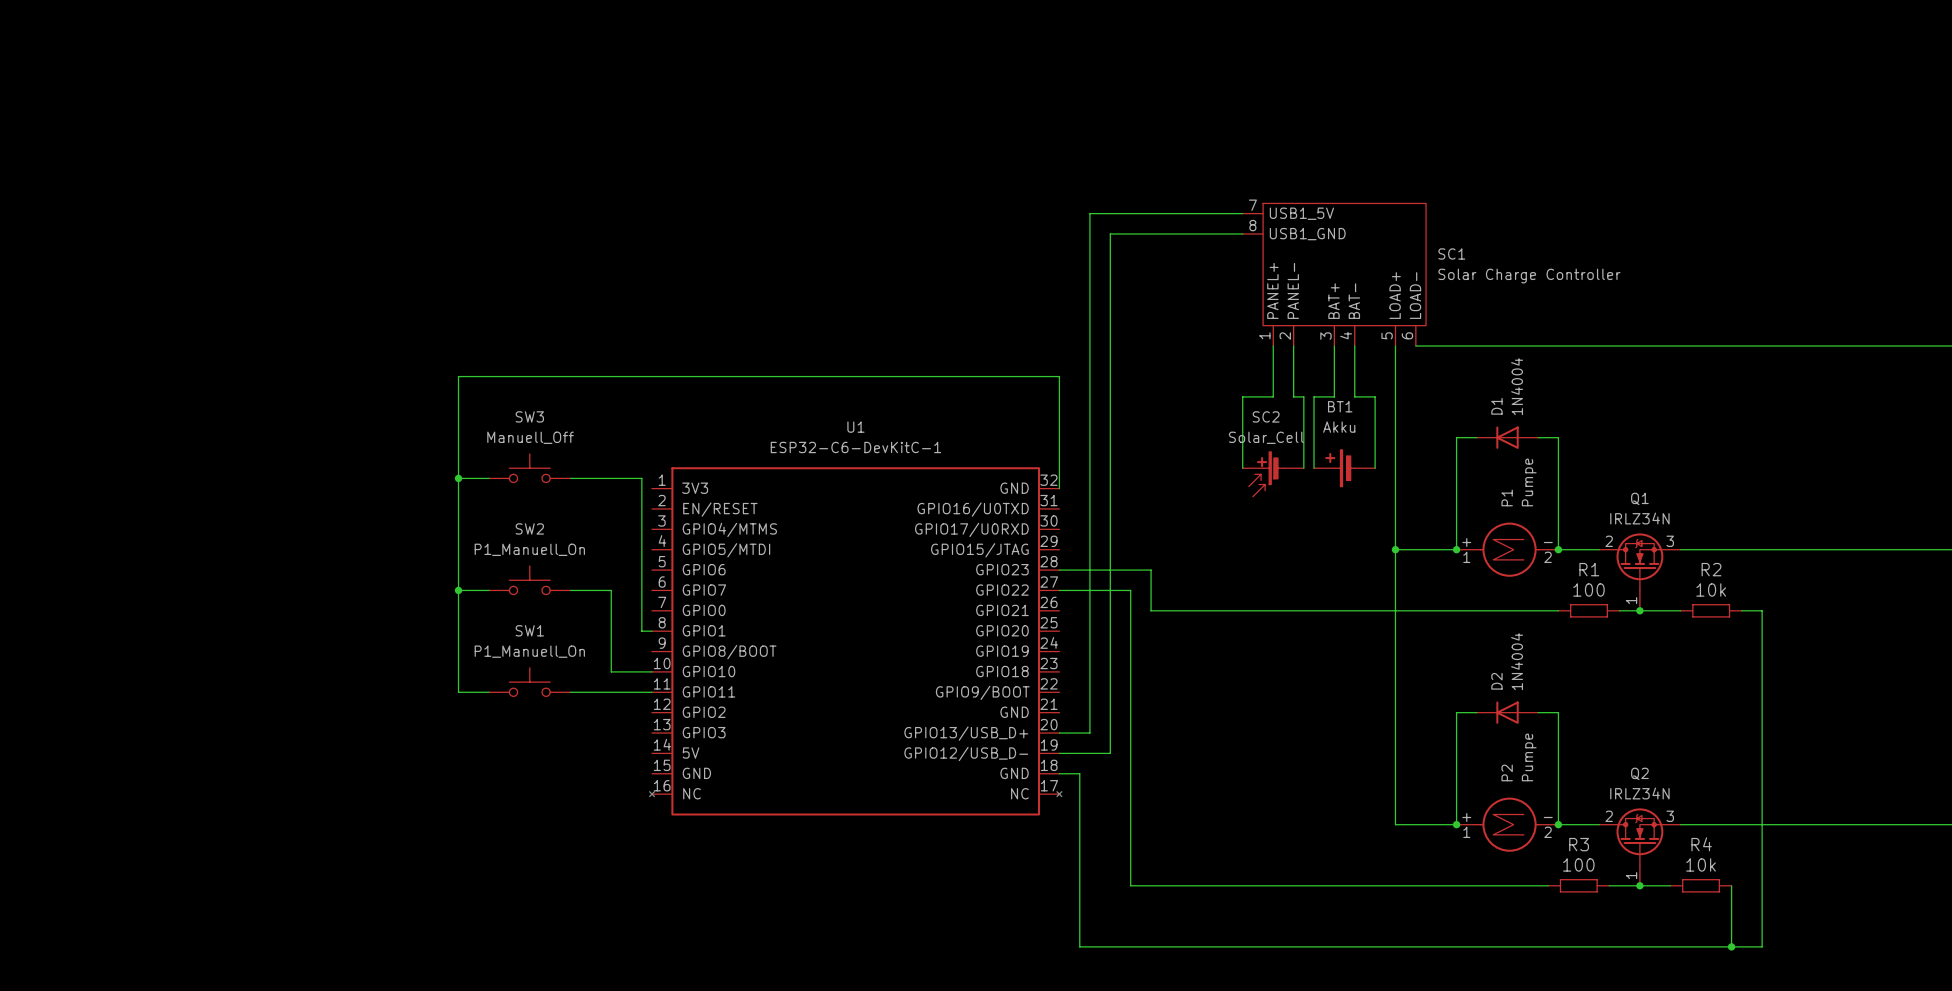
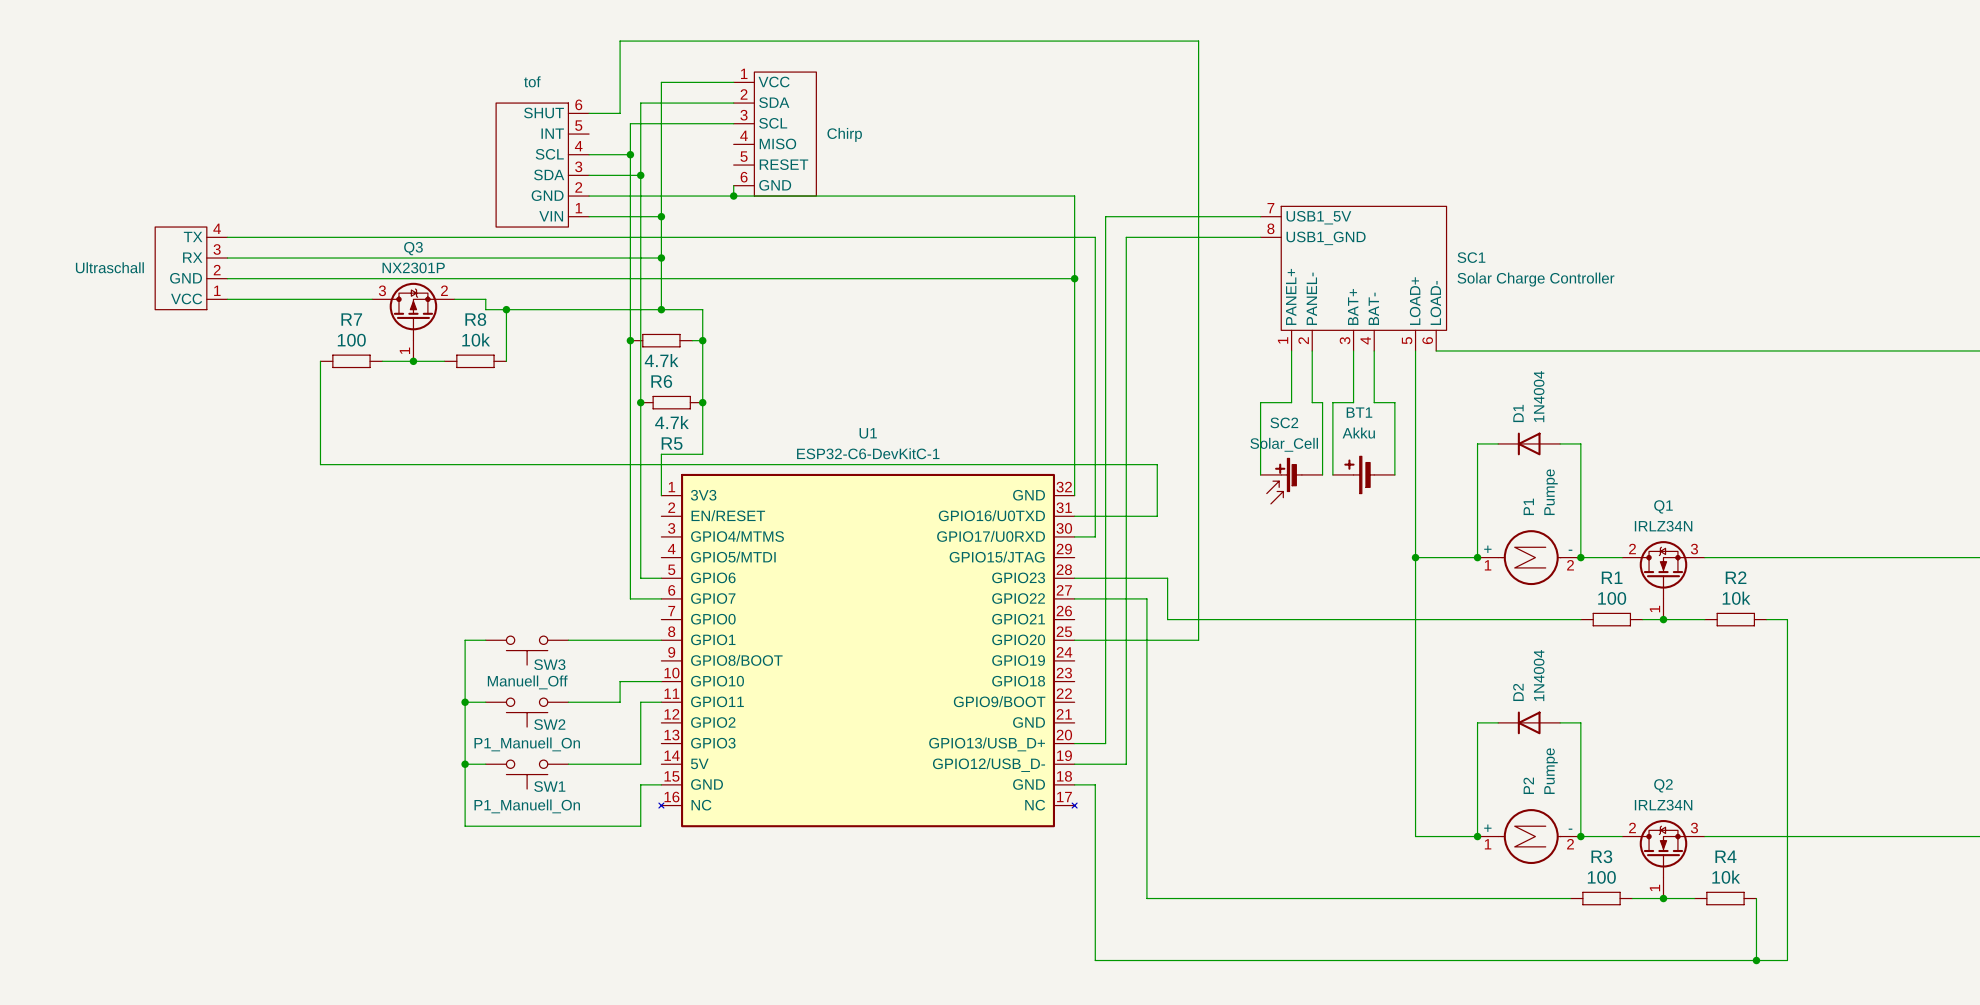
wire: none -> (733, 82) (661, 82) (661, 309)
wire: none -> (733, 103) (640, 103) (640, 578) (661, 578)
wire: none -> (589, 113) (620, 113) (620, 41) (1198, 41) (1198, 640) (1074, 640)
wire: none -> (733, 123) (630, 123) (630, 598) (661, 598)
Chirp: none -> (775, 134)
wire: none -> (589, 154) (630, 154)
junction: none -> (630, 154)
tof: none -> (542, 165)
wire: none -> (589, 175) (640, 175)
junction: none -> (640, 175)
wire: none -> (733, 185) (733, 196)
junction: none -> (733, 196)
wire: none -> (589, 216) (661, 216)
junction: none -> (661, 216)
wire: none -> (227, 237) (1095, 237) (1095, 536) (1074, 536)
wire: none -> (227, 258) (661, 258)
junction: none -> (661, 258)
Ultraschall: none -> (191, 268)
wire: none -> (227, 278) (1074, 278)
junction: none -> (1074, 278)
wire: none -> (227, 299) (372, 299)
wire: none -> (454, 299) (485, 299) (485, 309) (702, 309) (702, 454) (661, 454) (661, 495)
wire: none -> (506, 309) (506, 361)
junction: none -> (506, 309)
junction: none -> (661, 309)
Q3: none -> NX2301P (413, 322)
junction: none -> (630, 340)
R6: none -> 4.7k (661, 340)
wire: none -> (692, 340) (702, 340)
junction: none -> (702, 340)
wire: none -> (320, 361) (320, 464) (1157, 464) (1157, 516) (1074, 516)
R7: none -> 100 (351, 361)
wire: none -> (382, 361) (444, 361)
junction: none -> (413, 361)
R8: none -> 10k (475, 361)
wire: (1059, 376) (458, 376) (458, 631) -> (1074, 381) (1074, 196) (589, 196)
junction: none -> (640, 402)
R5: none -> 4.7k (671, 402)
junction: none -> (702, 402)
SW3 name position: SW3 (529, 416) -> SW3 (549, 664)
SW3 rotation: 0° (529, 468) -> 180° (527, 650)
SW3 position: (529, 468) -> (527, 650)
wire: (458, 478) (489, 478) -> none
junction: (458, 478) -> none
wire: (570, 478) (641, 478) (641, 631) -> (568, 640) (651, 640)
SW2 name position: SW2 (529, 528) -> SW2 (549, 724)
SW2 rotation: 0° (529, 580) -> 180° (527, 712)
SW2 position: (529, 580) -> (527, 712)
wire: (458, 590) (489, 590) -> none
junction: (458, 590) -> none
wire: (570, 590) (611, 590) (611, 671) -> none
SW1 name position: SW1 (529, 630) -> SW1 (549, 786)
wire: none -> (465, 640) (485, 640)
SW1 rotation: 0° (529, 682) -> 180° (527, 774)
SW1 position: (529, 682) -> (527, 774)
wire: none -> (465, 702) (465, 826) (640, 826) (640, 784) (661, 784)
junction: none -> (465, 702)
wire: (611, 692) (631, 692) -> (620, 702) (620, 681)
wire: none -> (640, 702) (640, 764) (568, 764)
wire: none -> (465, 764) (485, 764)
junction: none -> (465, 764)

